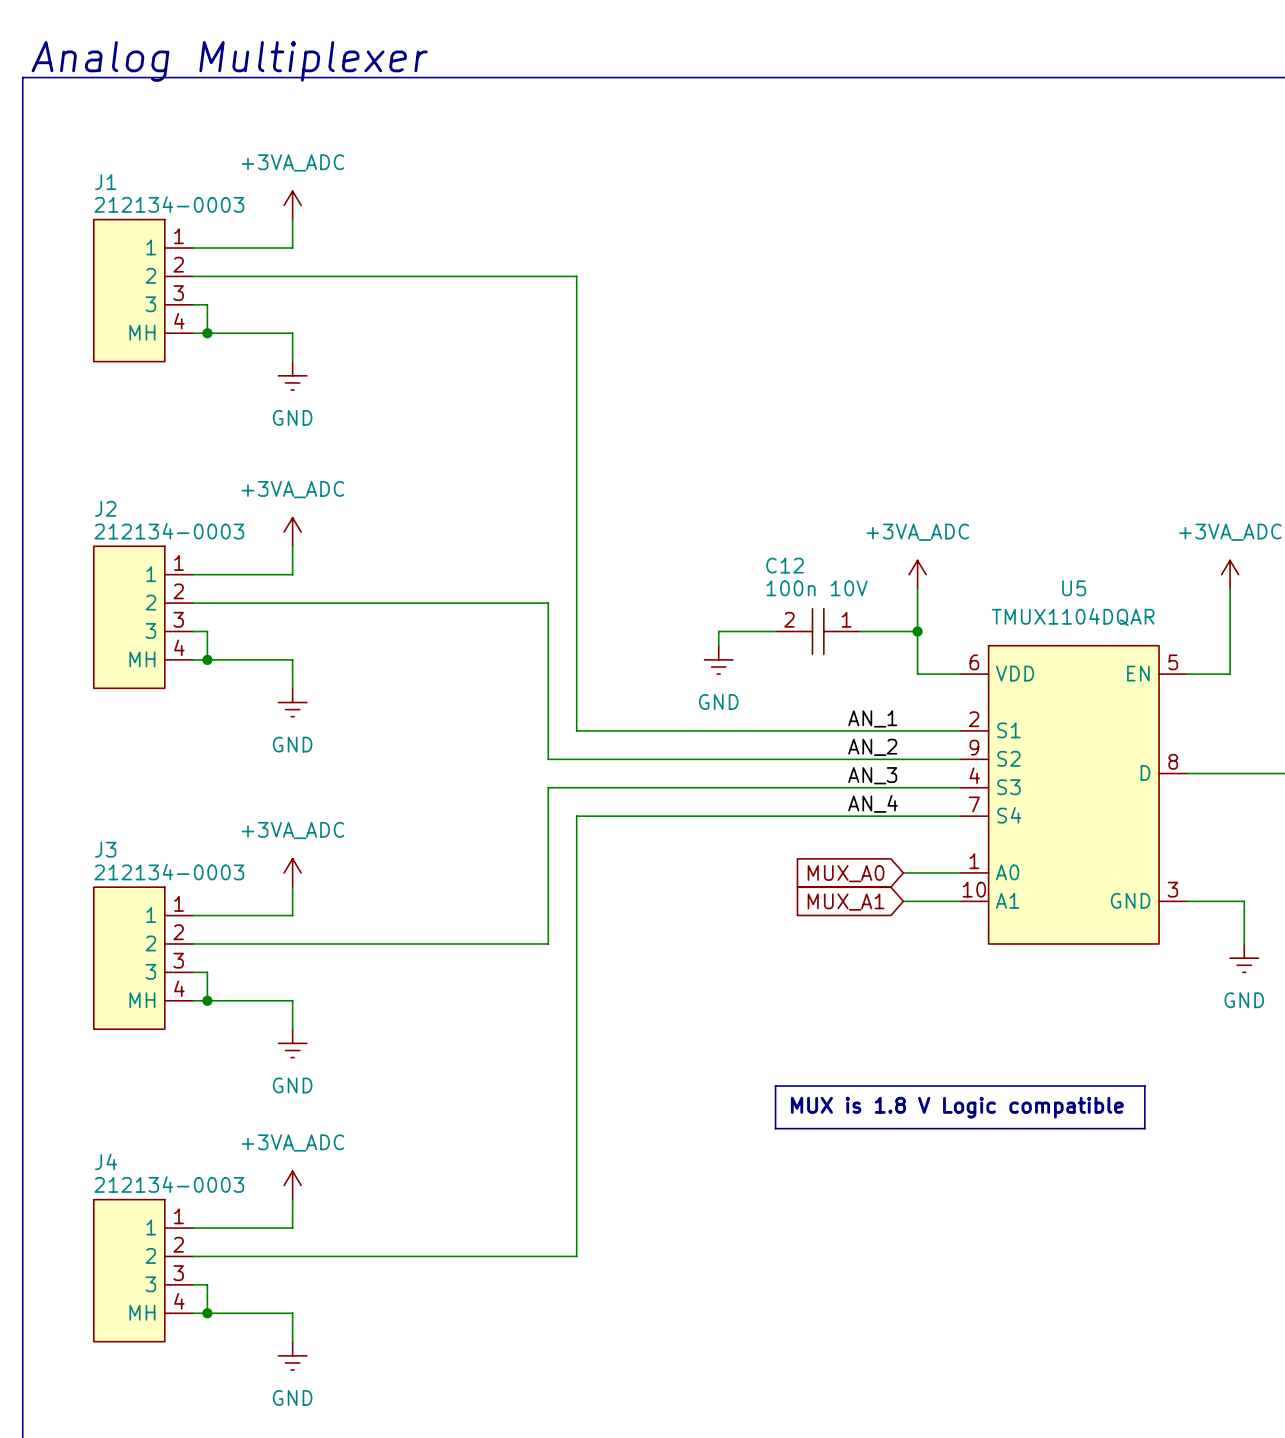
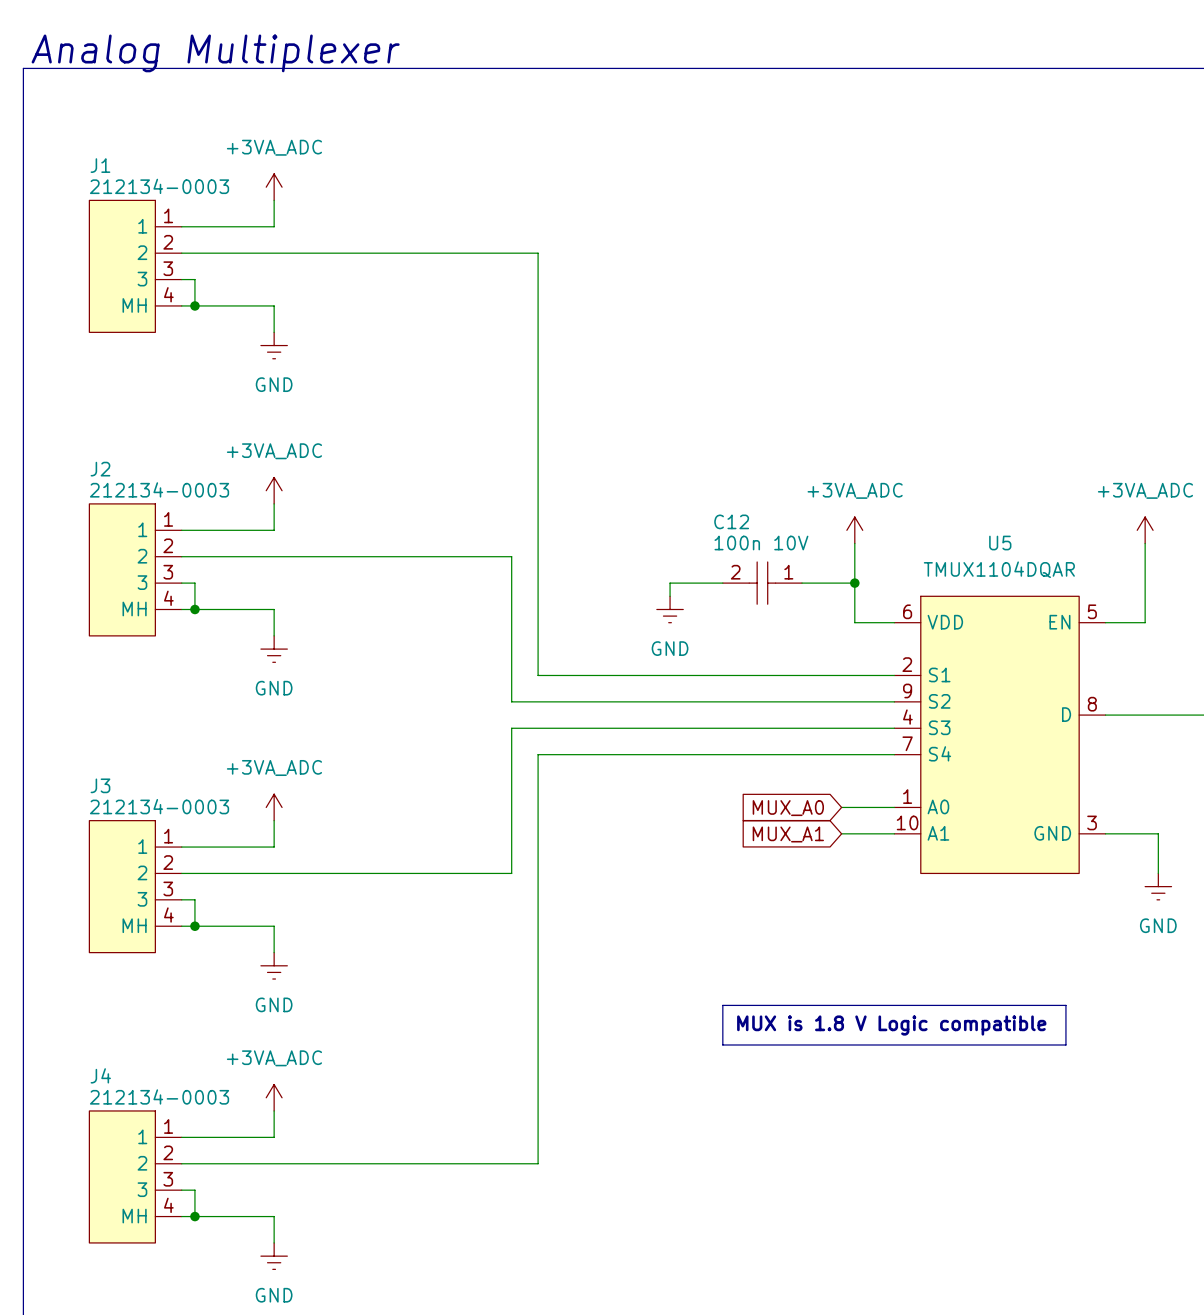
label: AN_1 (872, 718) -> none
label: AN_2 (872, 747) -> none
label: AN_3 (872, 775) -> none
label: AN_4 (873, 803) -> none

